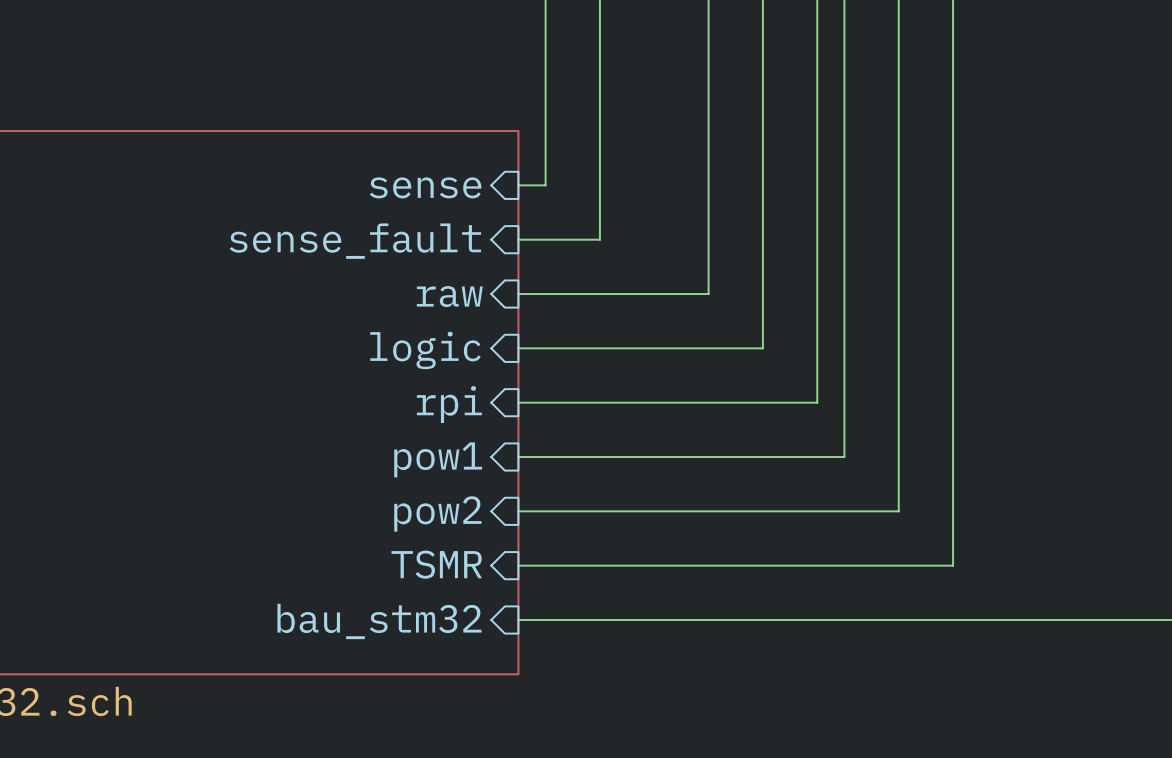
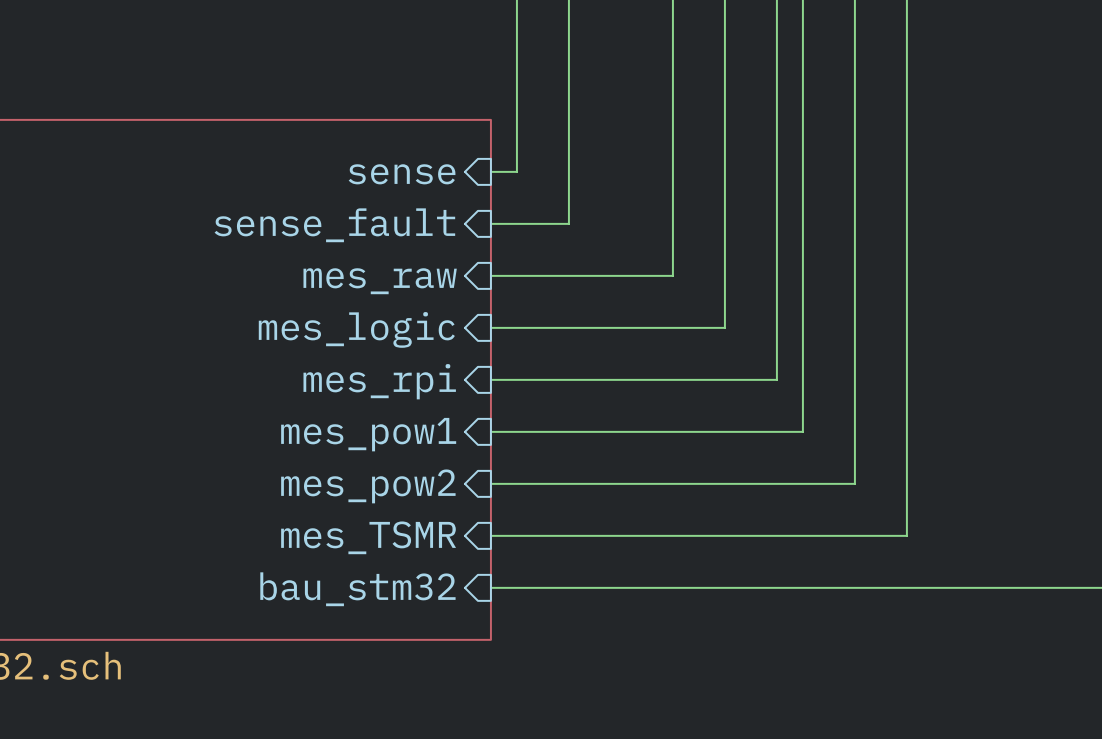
sheet pin: raw (449, 296) -> mes_raw (380, 281)
sheet pin: logic (425, 350) -> mes_logic (356, 329)
sheet pin: rpi (449, 404) -> mes_rpi (379, 381)
sheet pin: pow1 (438, 459) -> mes_pow1 (368, 434)
sheet pin: pow2 (437, 513) -> mes_pow2 (368, 486)
sheet pin: TSMR (436, 564) -> mes_TSMR (368, 537)

